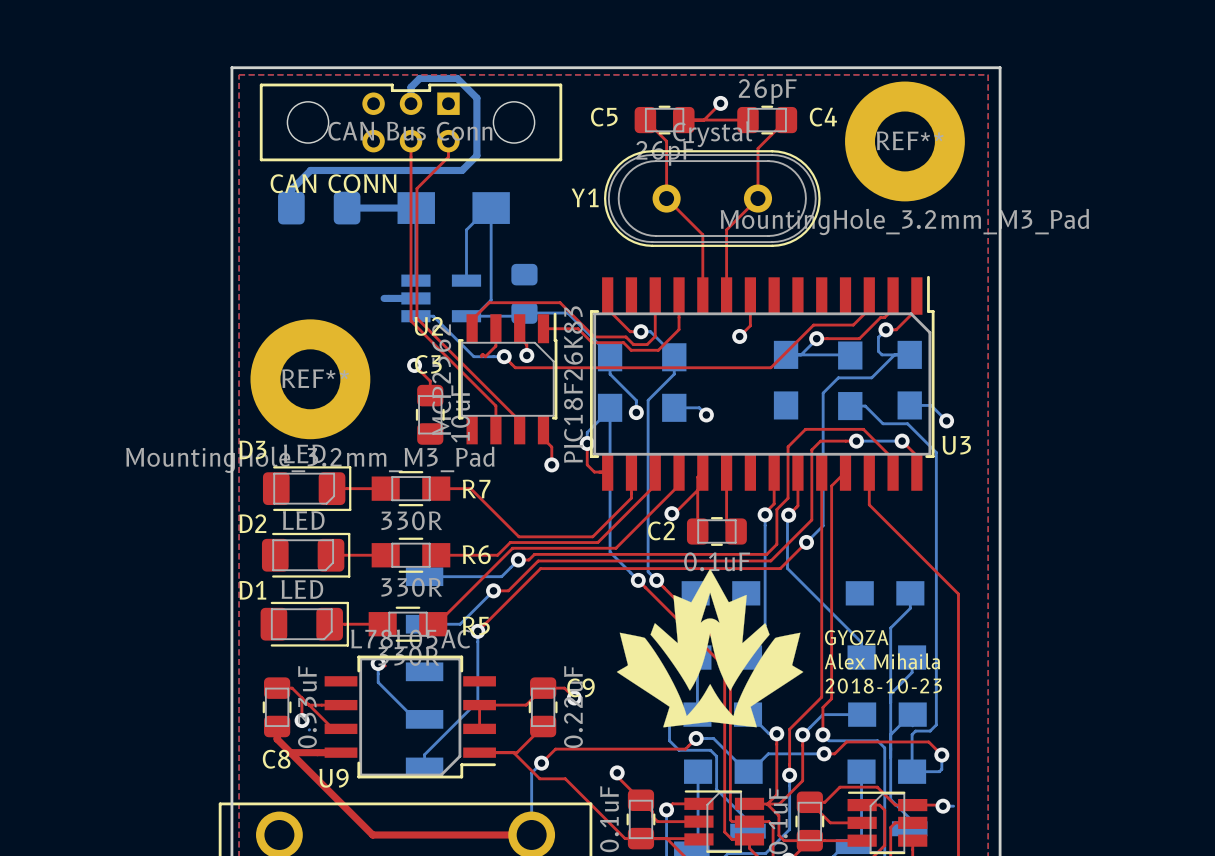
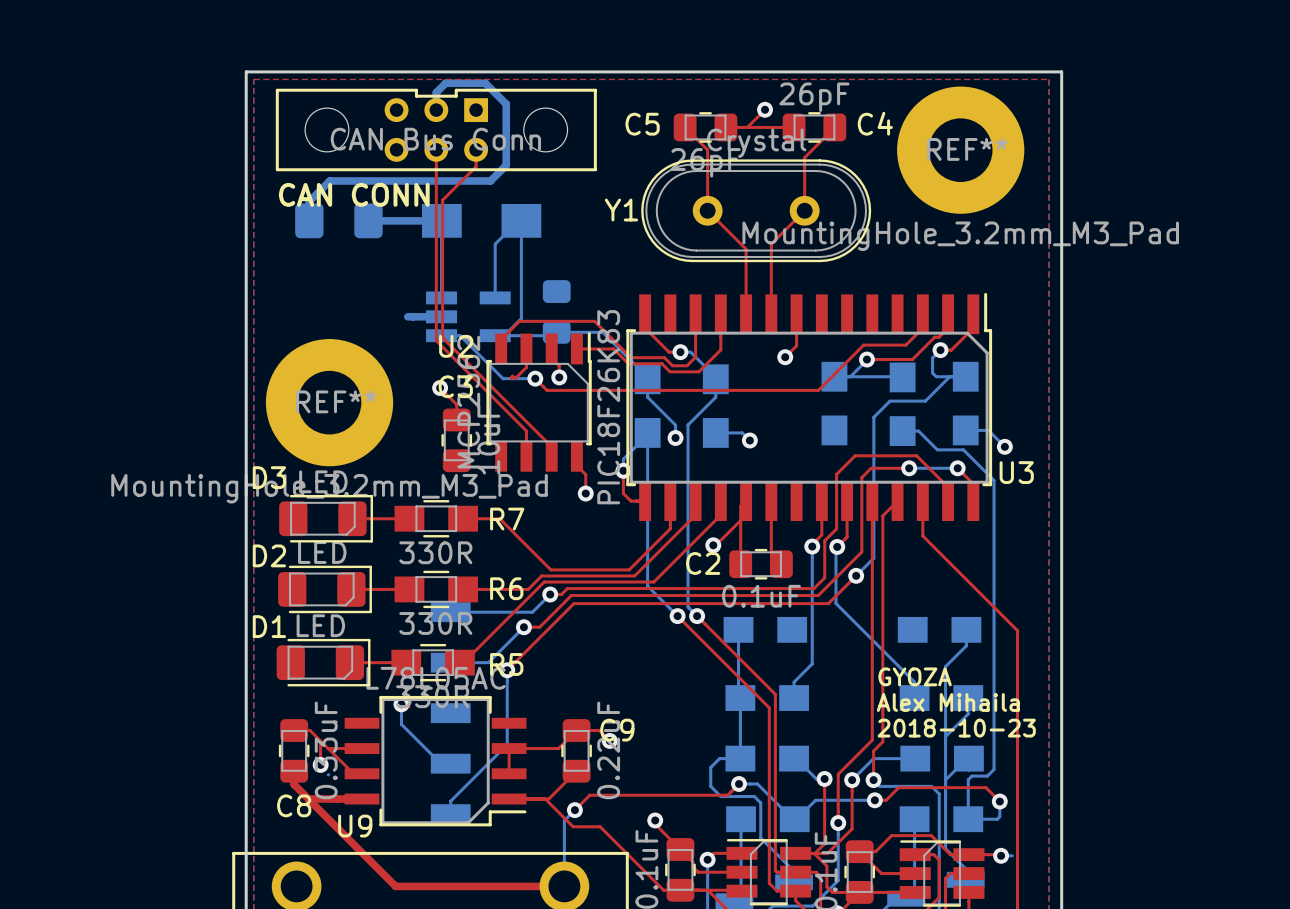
drawing: [616, 568, 804, 728] -> none

